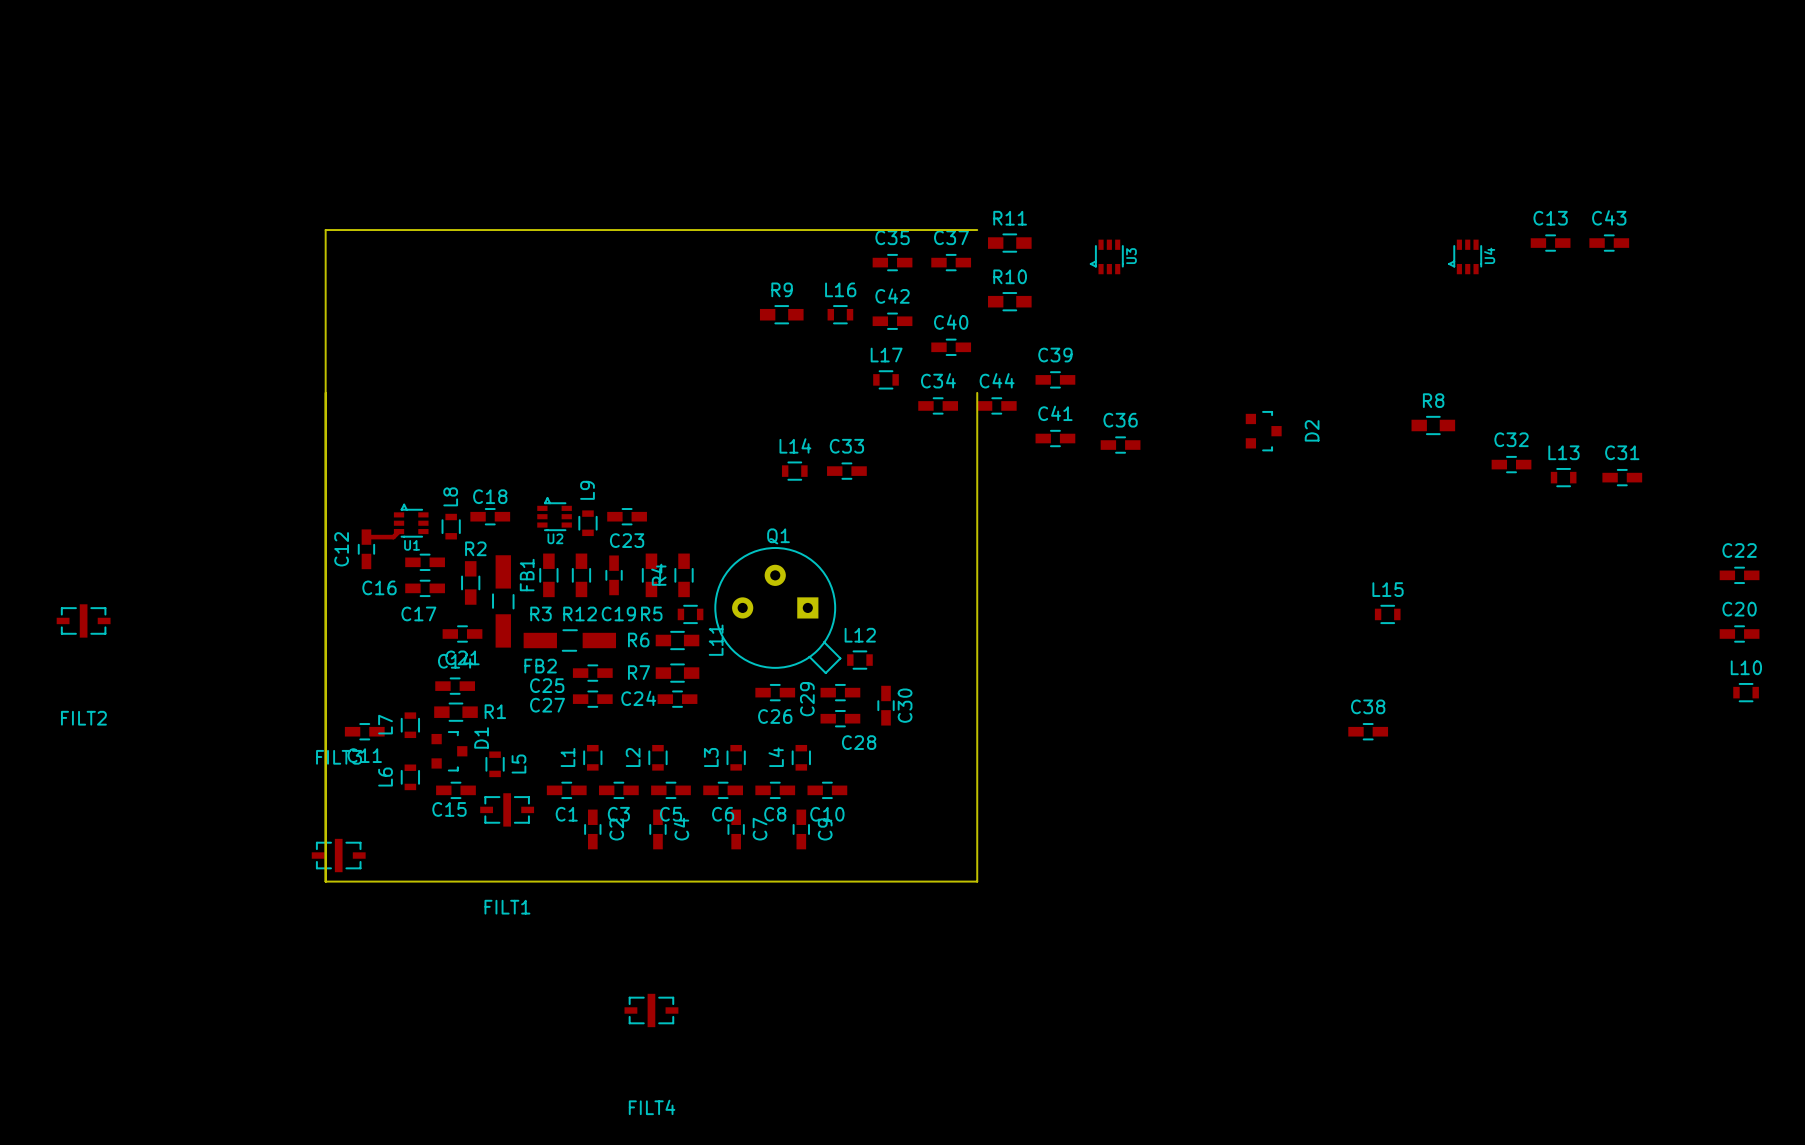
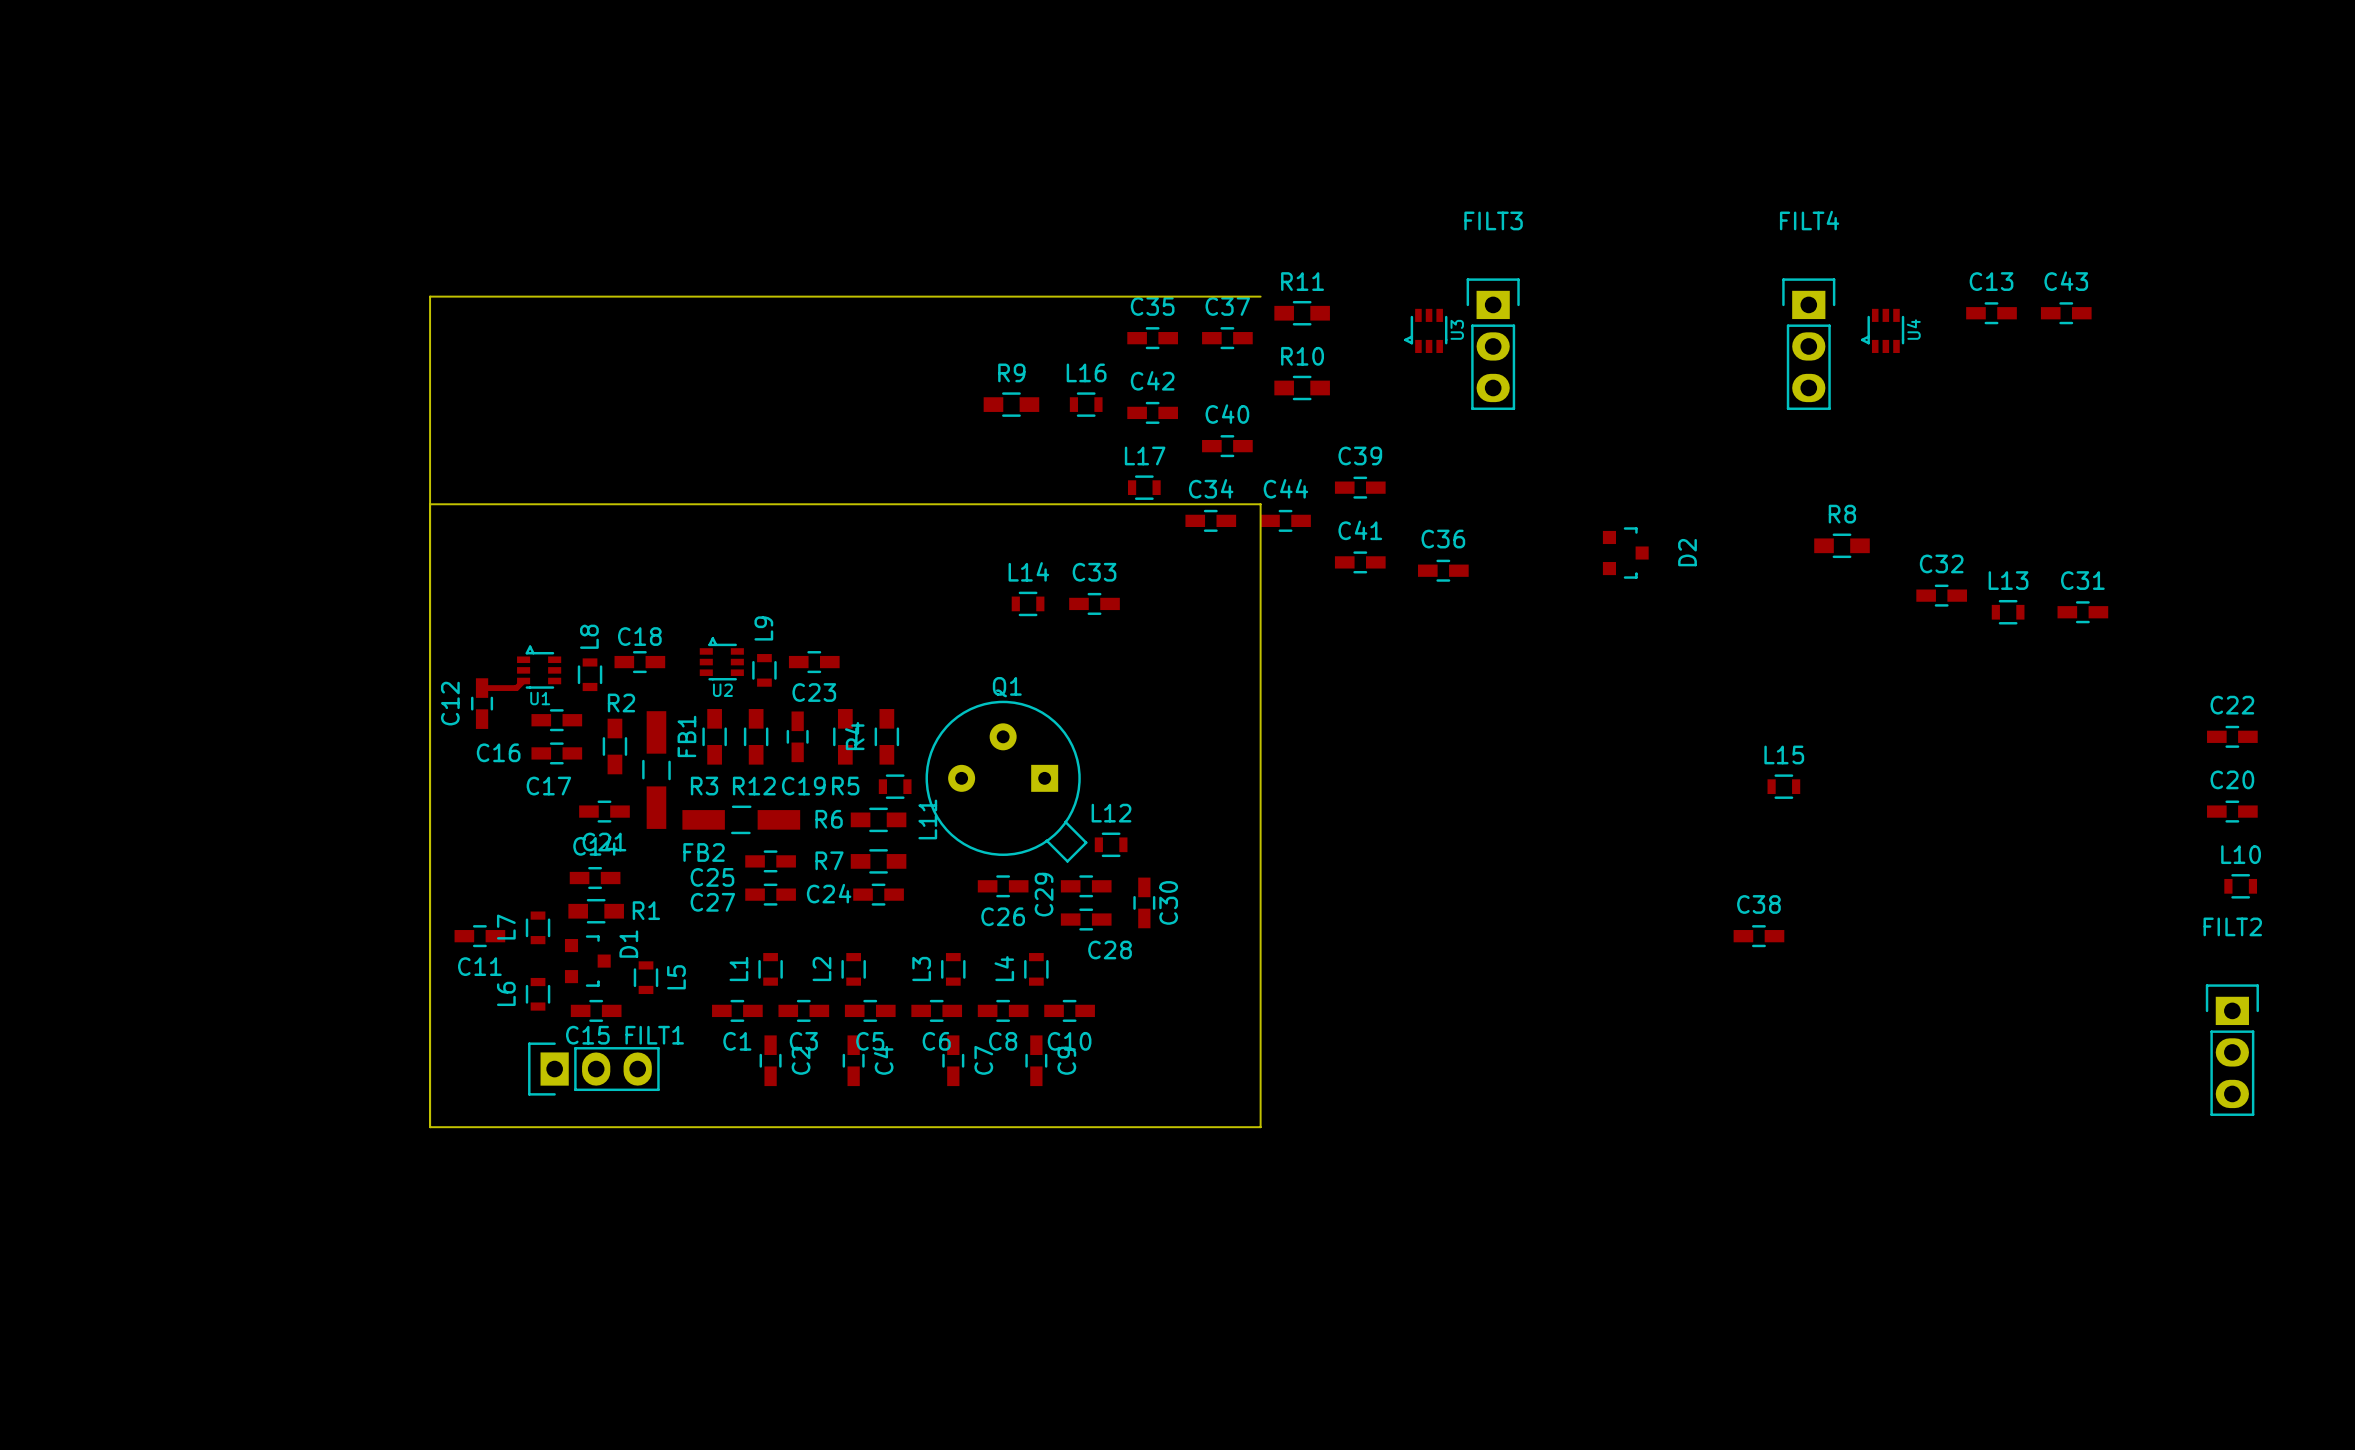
board edge: none -> (430, 504) (1260, 504)
FILT2 footprint: [56, 604, 111, 638] -> [2205, 984, 2259, 1116]
FILT2 name position: FILT2 (83, 718) -> FILT2 (2232, 926)
FILT1 footprint: [480, 793, 535, 827] -> [528, 1042, 660, 1096]
FILT3 footprint: [311, 838, 366, 873] -> [1466, 278, 1520, 410]
FILT1 name position: FILT1 (507, 907) -> FILT1 (654, 1035)
FILT4 footprint: [624, 993, 679, 1028] -> [1782, 278, 1836, 410]
FILT4 name position: FILT4 (652, 1107) -> FILT4 (1809, 220)

